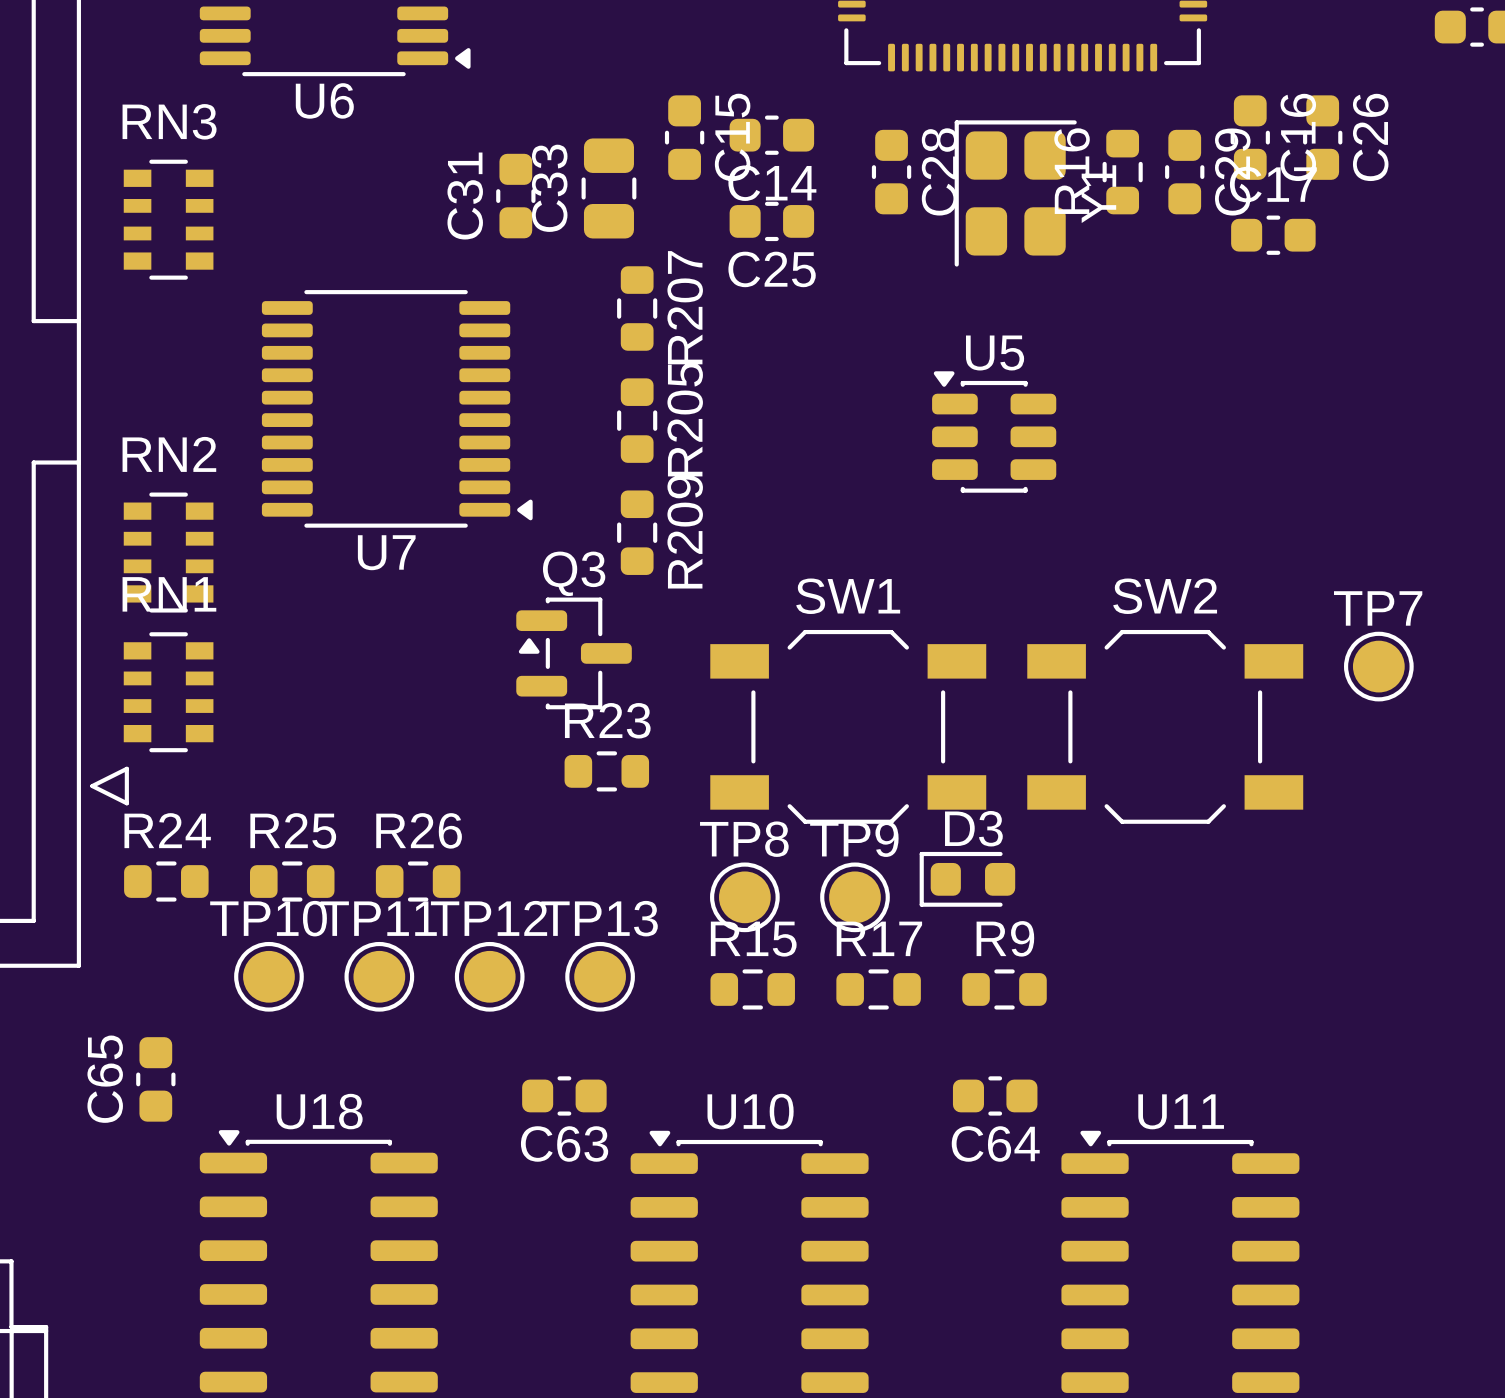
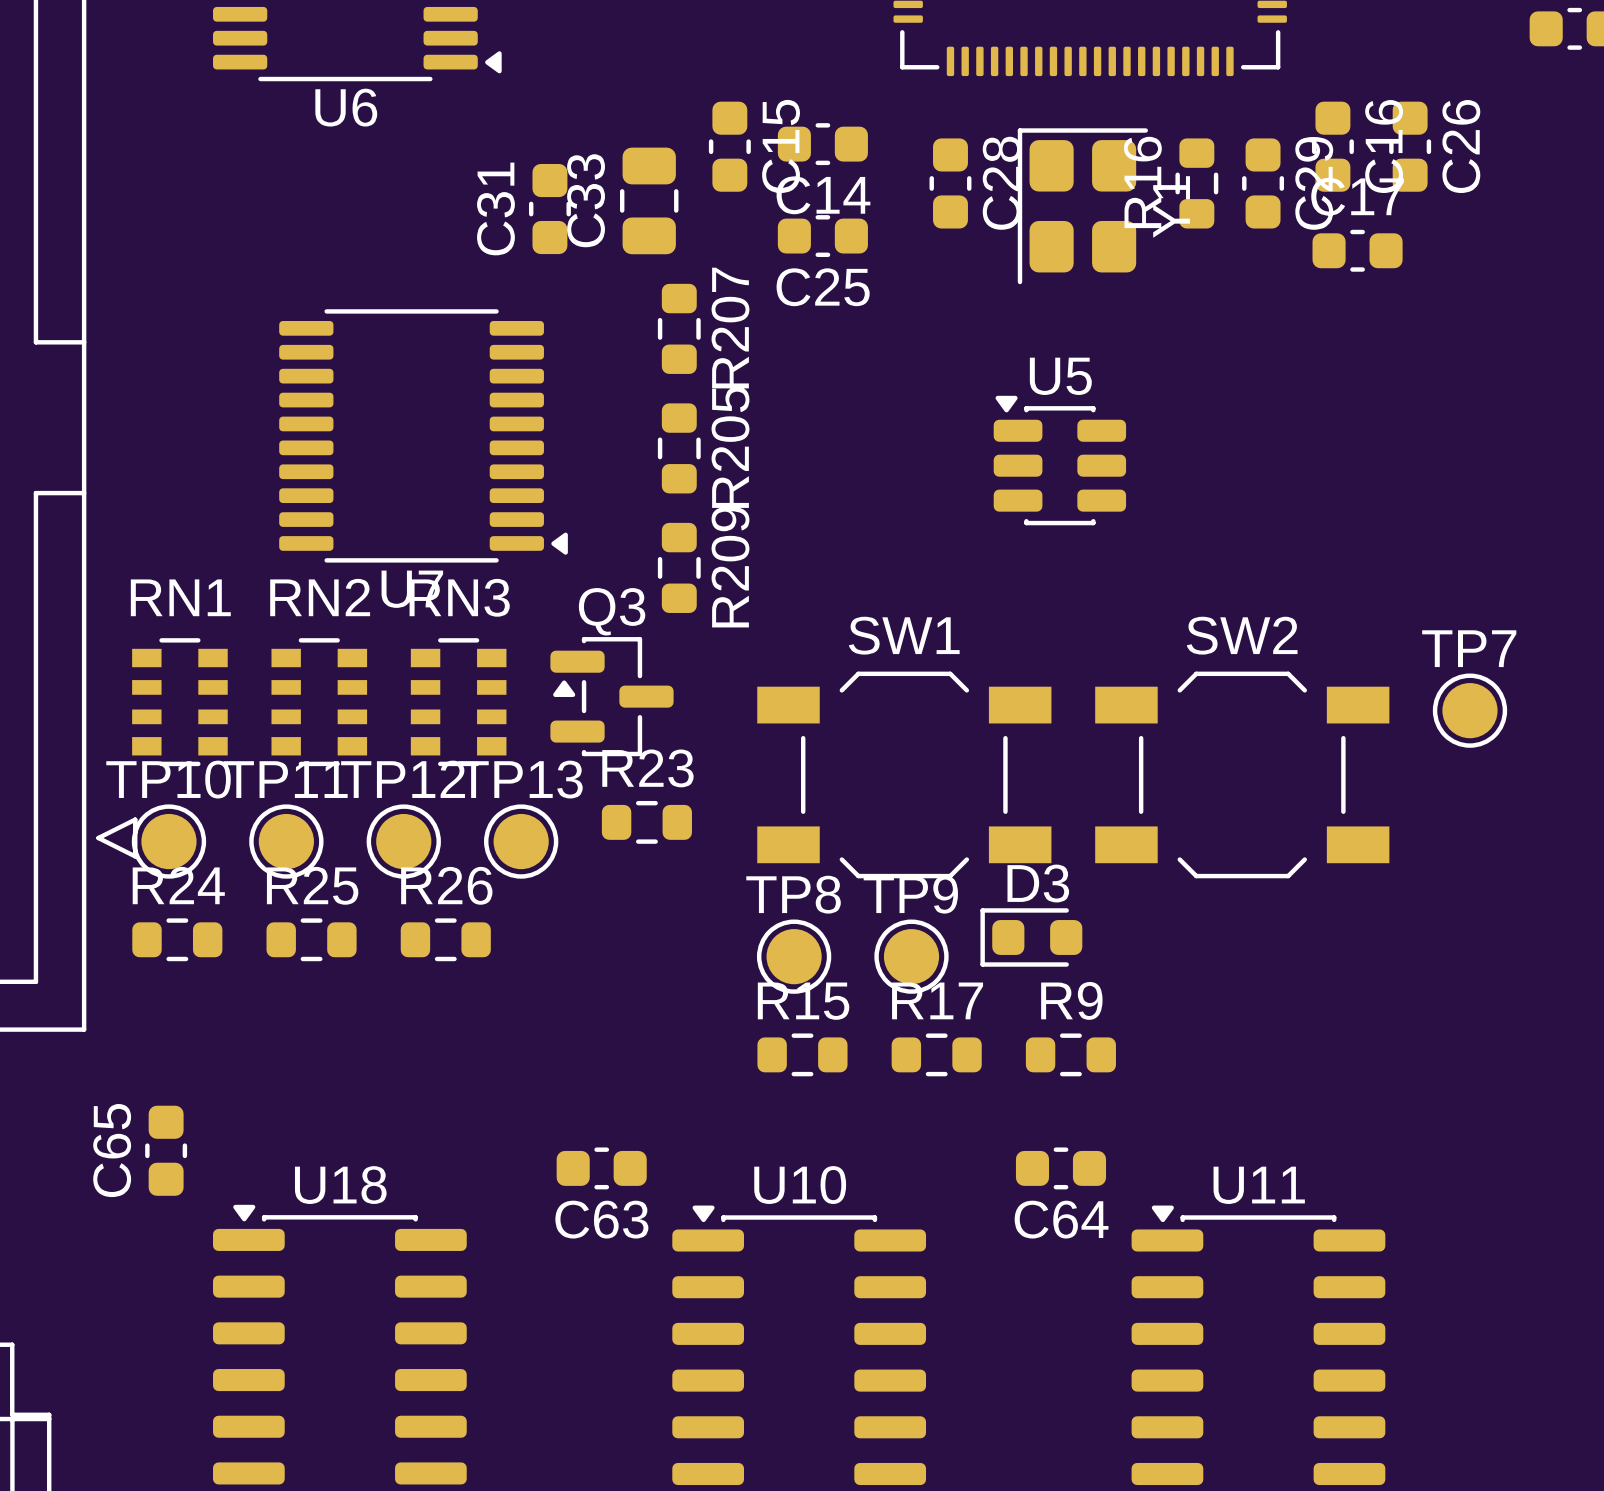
RN3 position: (168, 219) -> (458, 702)
RN2 position: (168, 552) -> (319, 702)
RN1 position: (168, 692) -> (179, 702)
TP10 position: (268, 976) -> (168, 841)
TP11 position: (379, 976) -> (286, 841)
TP12 position: (489, 976) -> (403, 841)
TP13 position: (600, 976) -> (521, 841)

